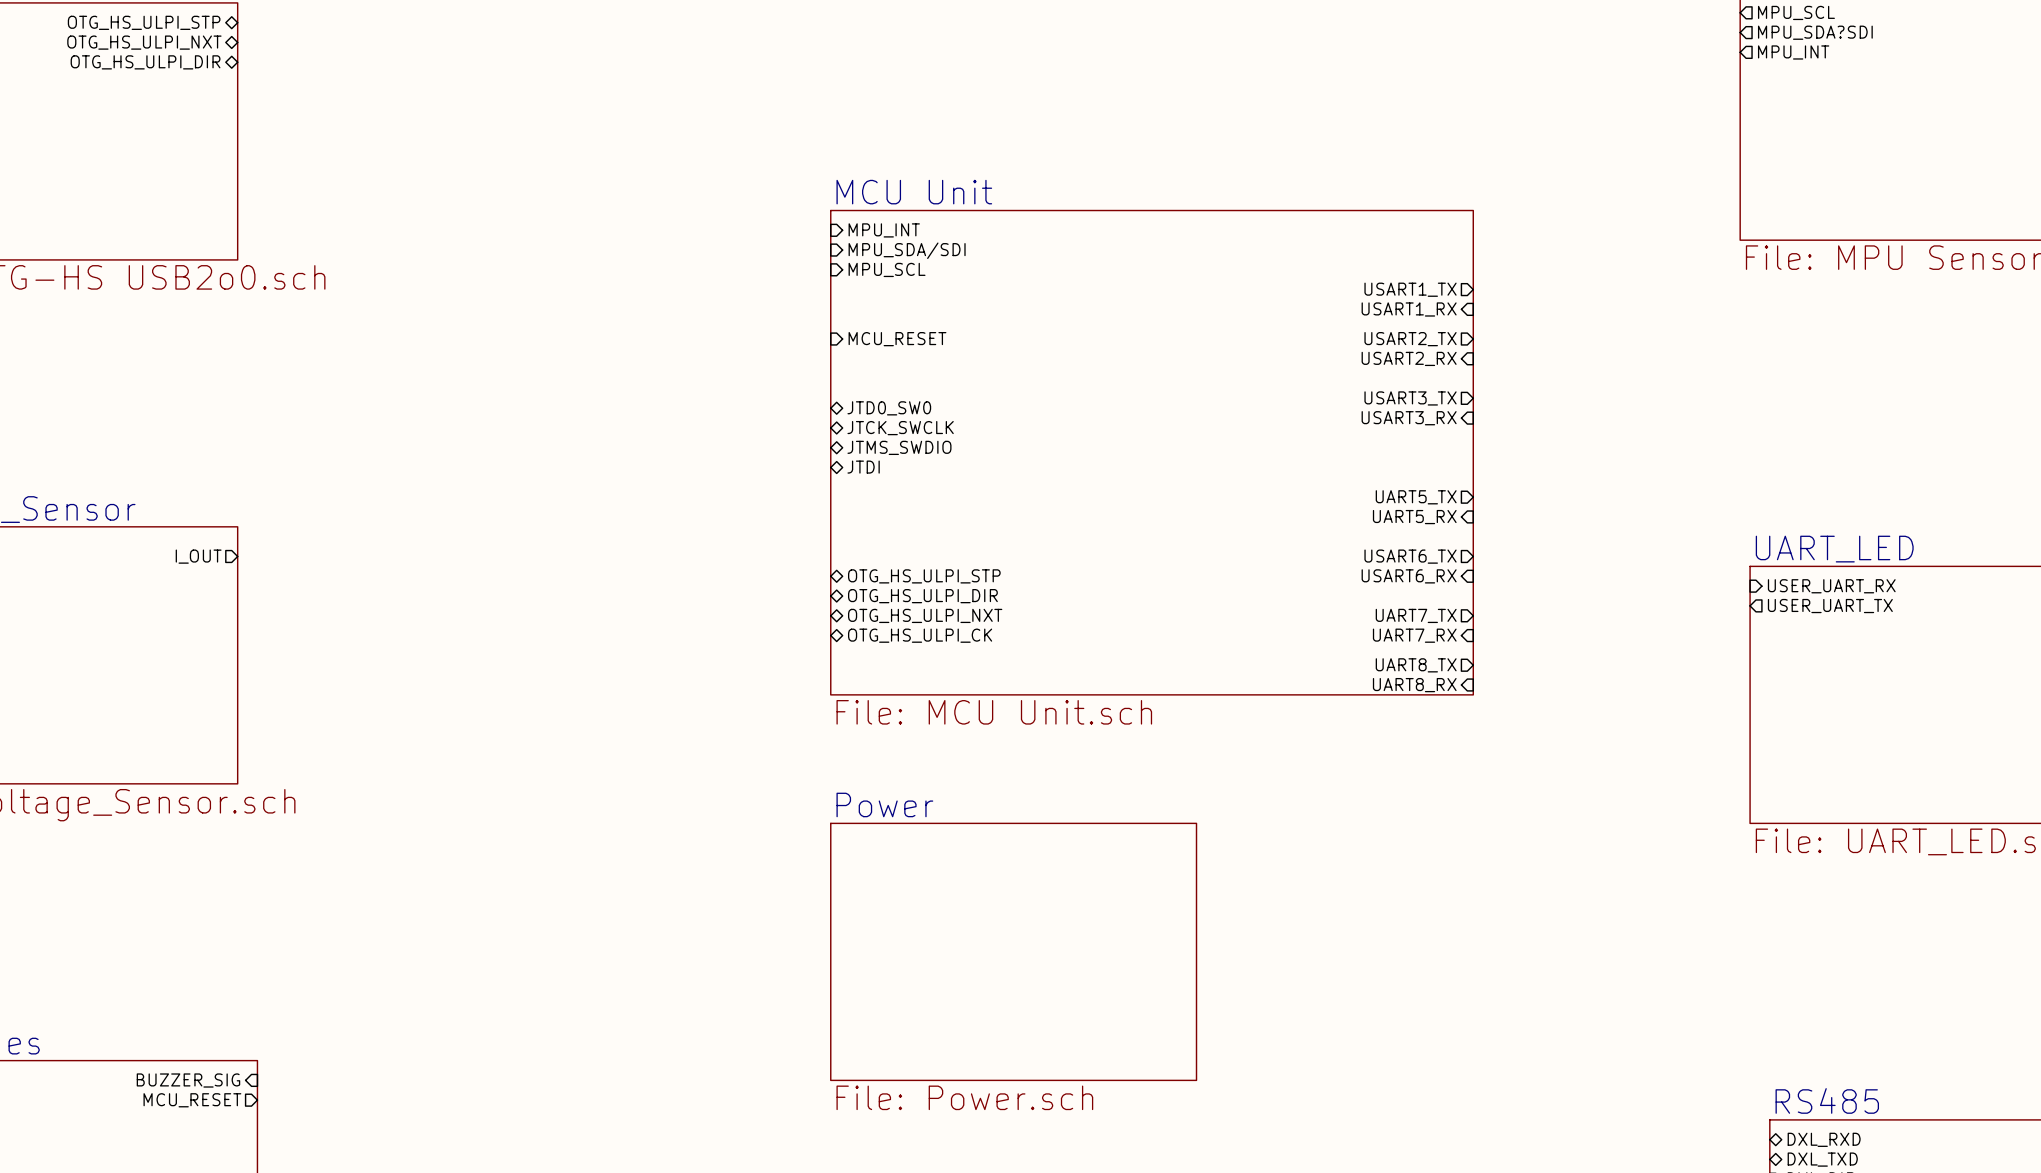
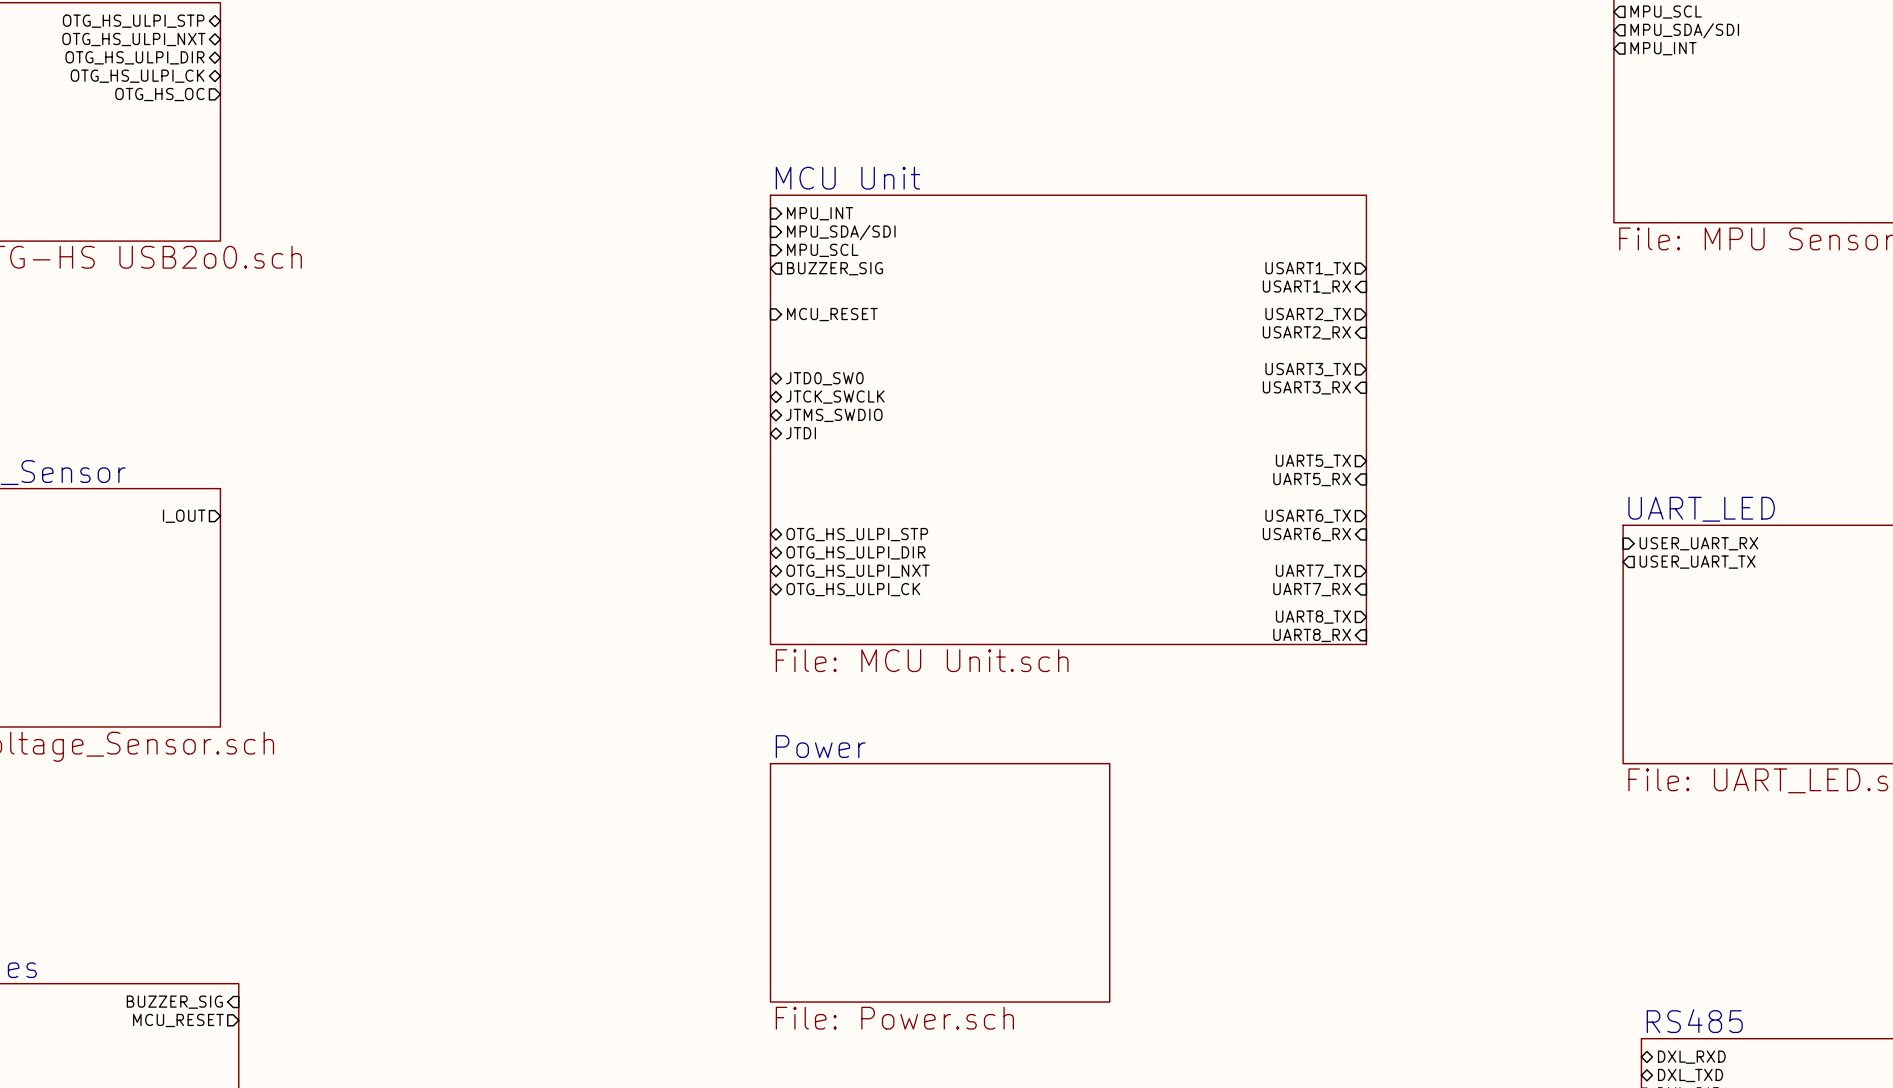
sheet pin: MPU_SDA?SDI (1815, 32) -> MPU_SDA/SDI (1684, 30)
sheet pin: none -> OTG_HS_ULPI_CK (137, 76)
sheet pin: none -> OTG_HS_OC (159, 94)
sheet pin: none -> BUZZER_SIG (835, 268)

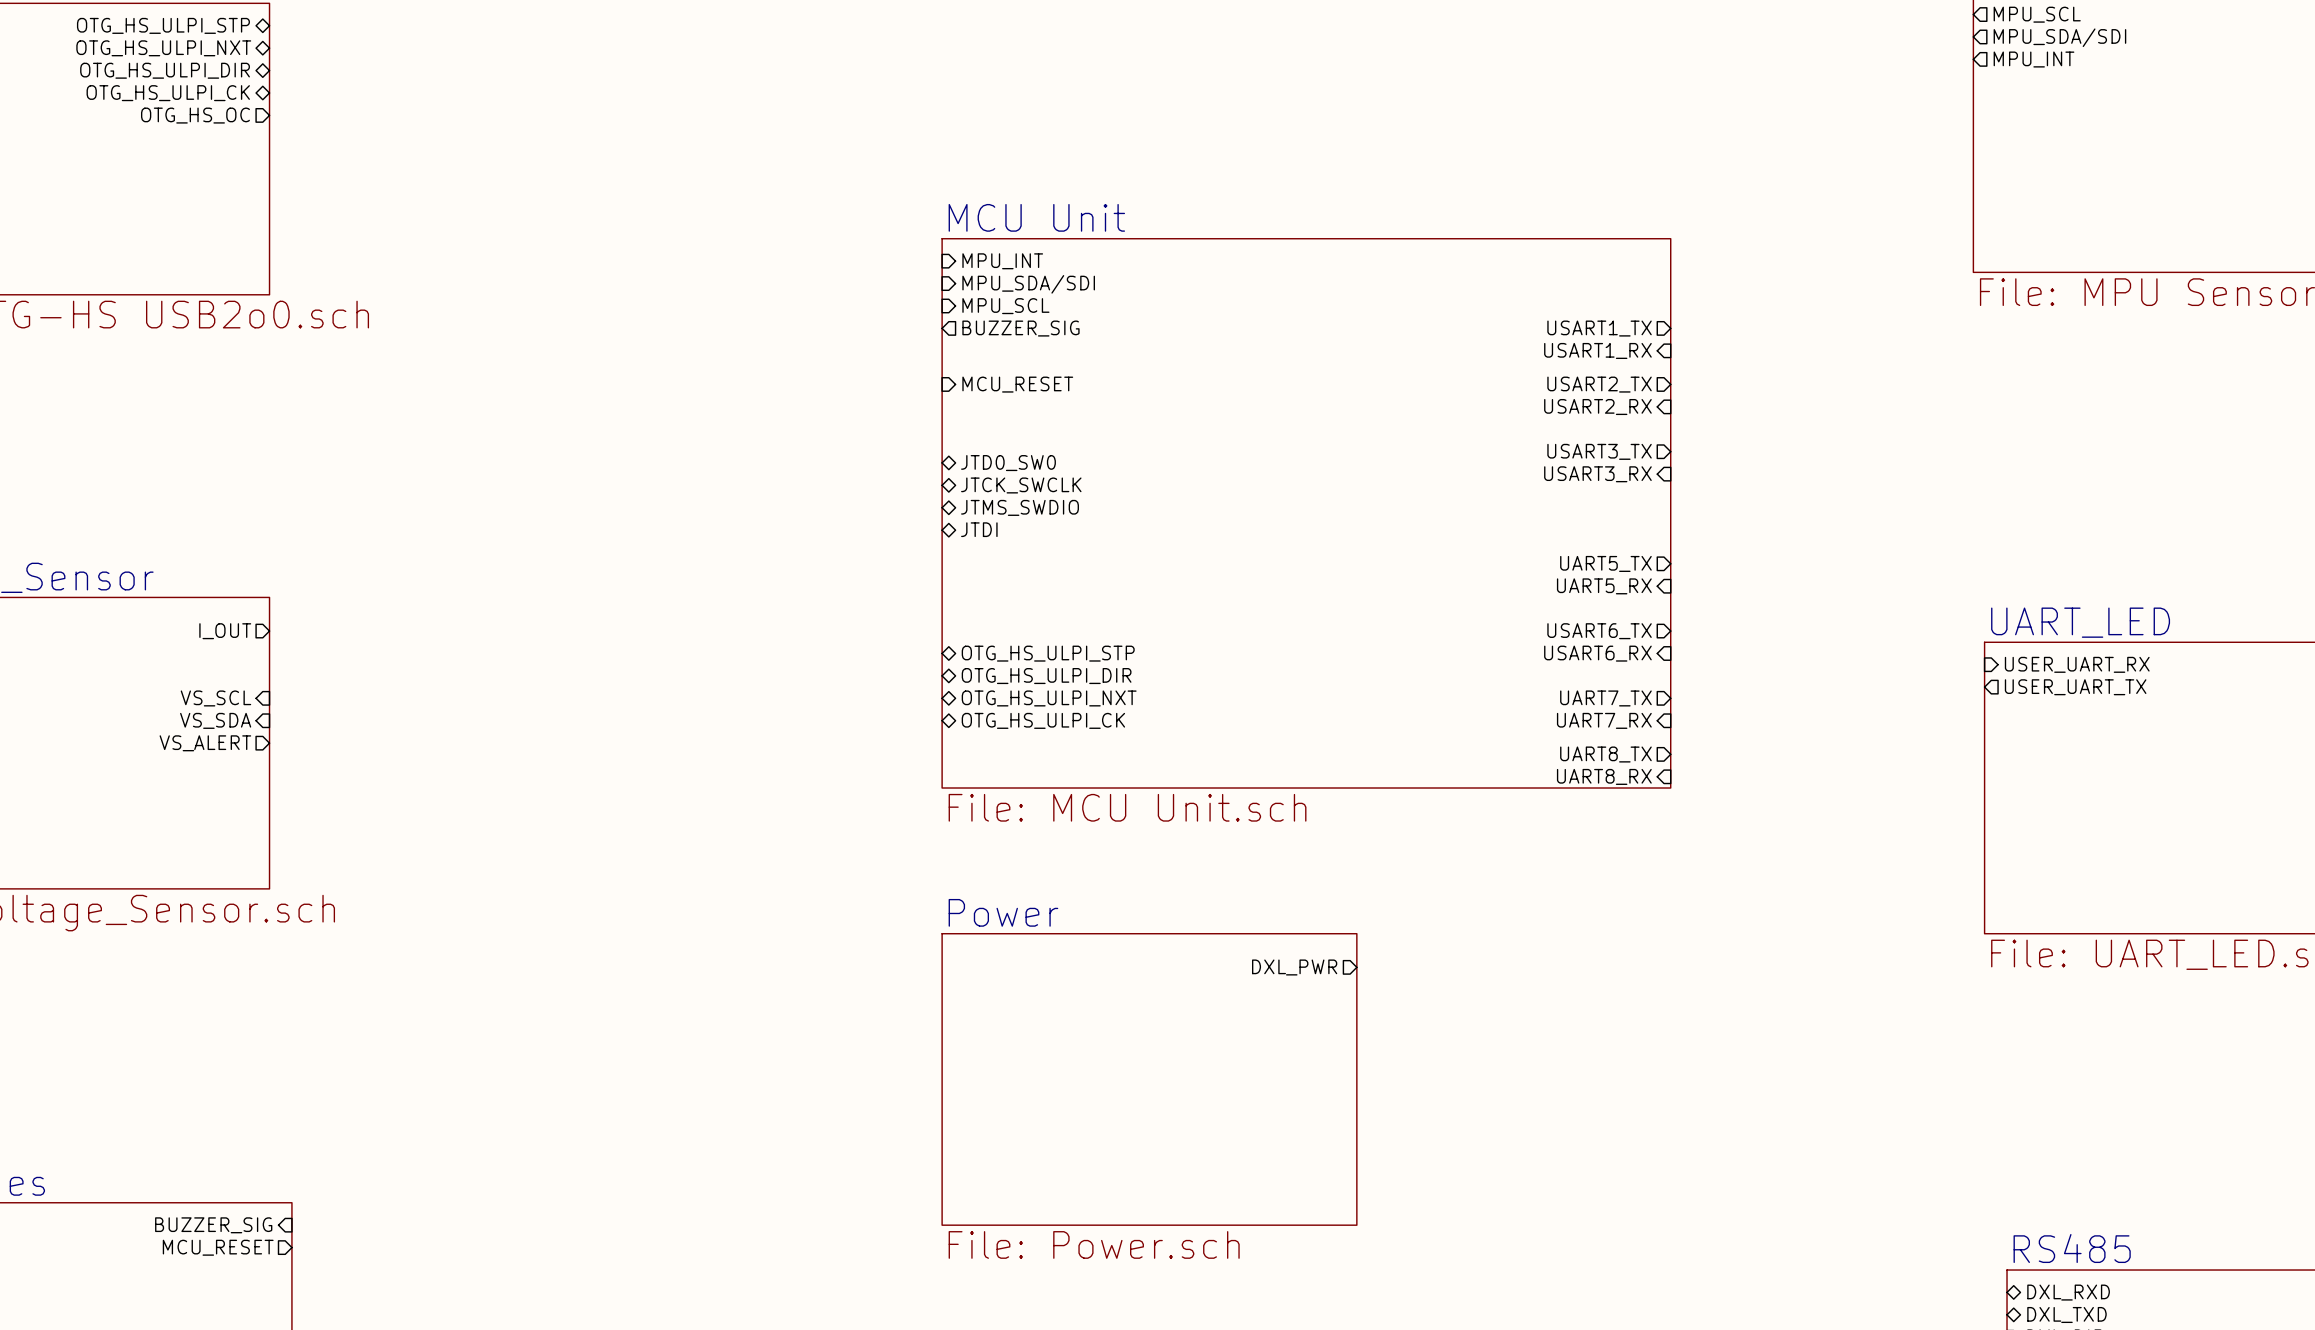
sheet pin: none -> VS_SCL (215, 698)
sheet pin: none -> VS_SDA (215, 720)
sheet pin: none -> VS_ALERT (205, 743)
sheet pin: none -> DXL_PWR (1294, 967)

